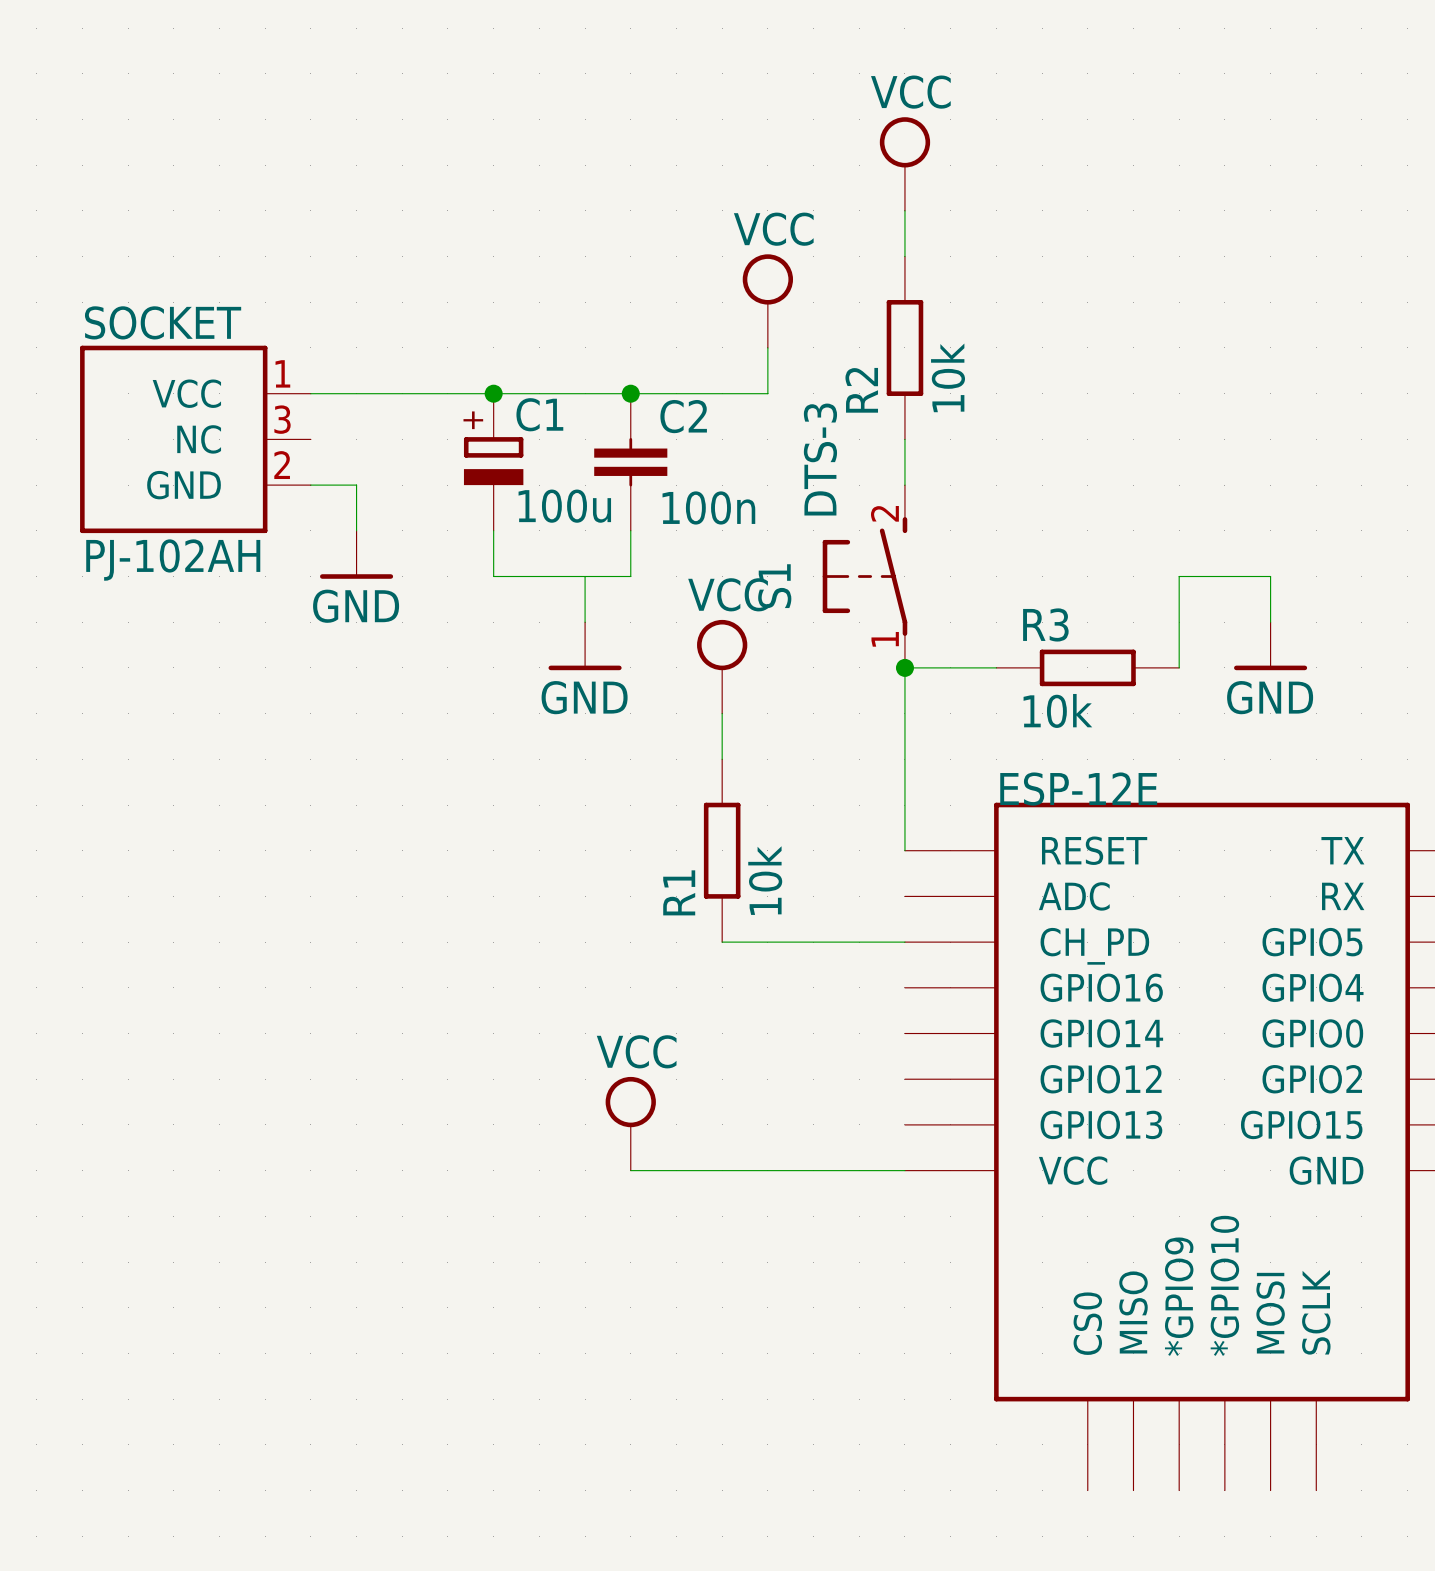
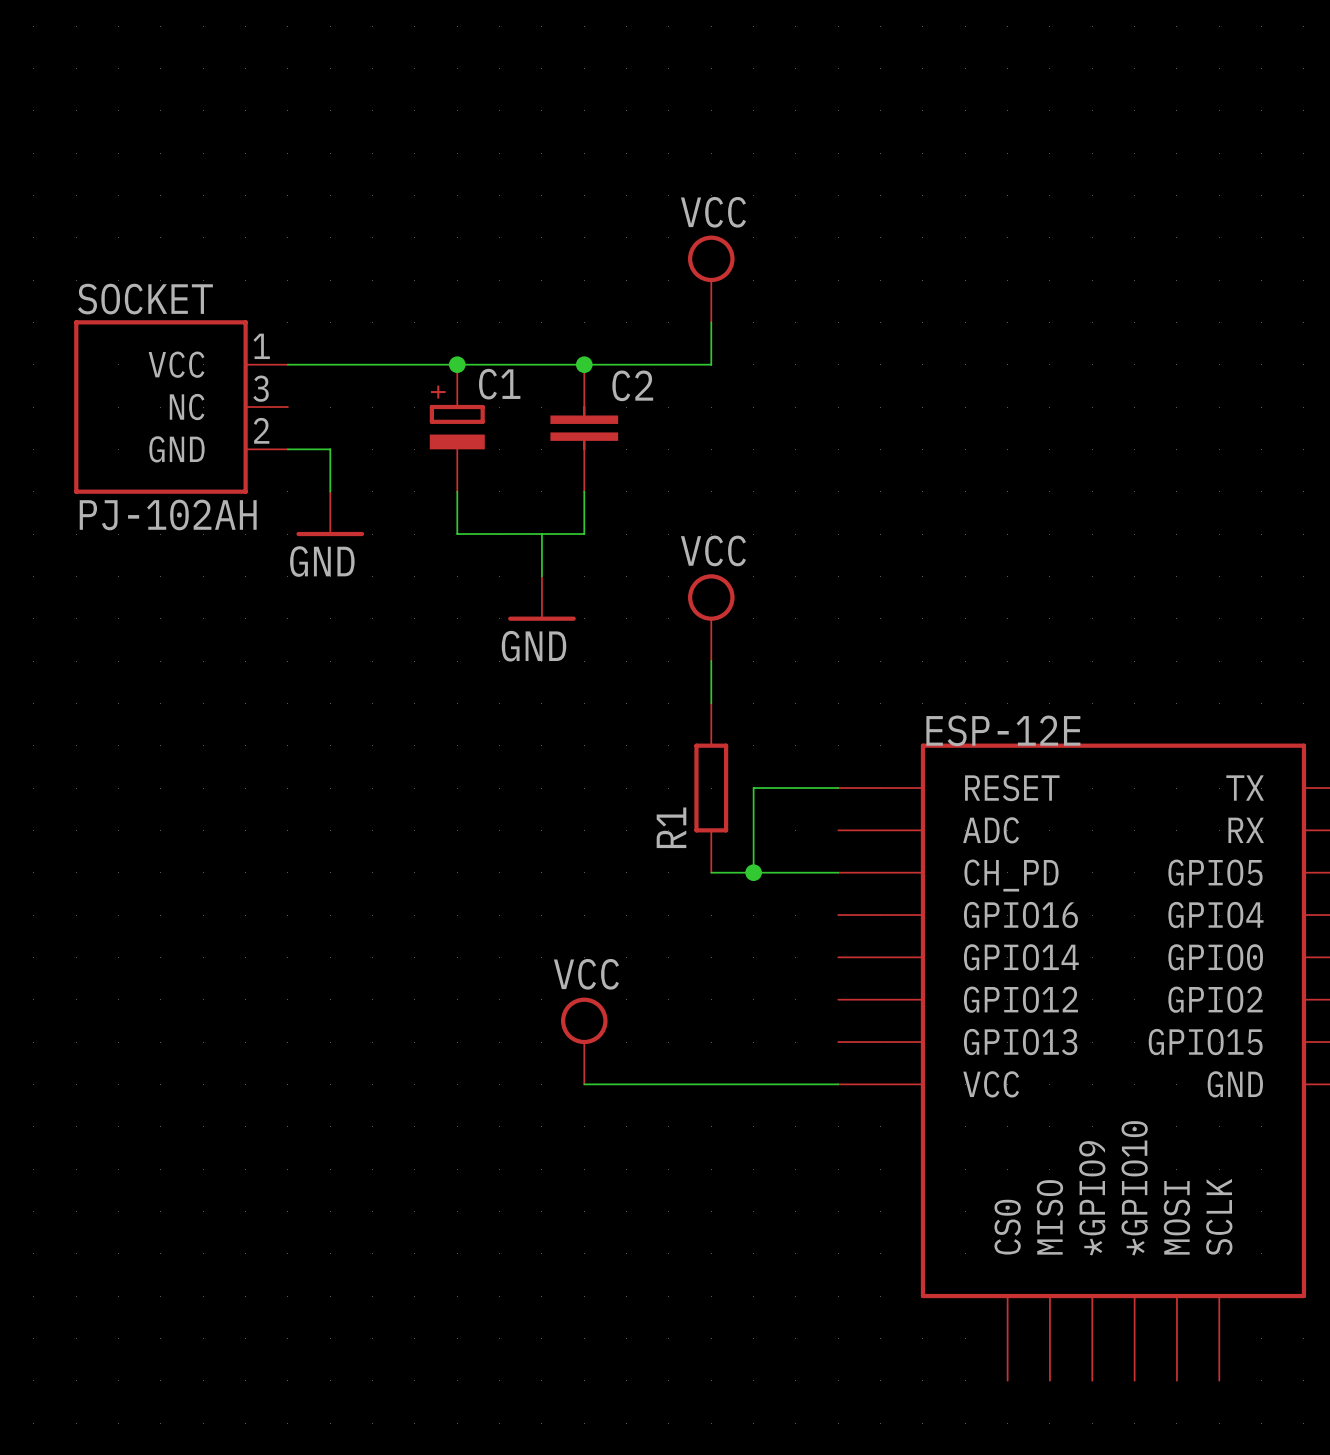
power symbol: VCC (904, 164) -> none
wire: (904, 210) (904, 256) -> none
R2: 10k (904, 347) -> none
wire: (904, 439) (904, 485) -> none
C1 value: 100u (564, 506) -> none
C2 value: 100n (708, 507) -> none
S1: DTS-3 (864, 576) -> none
wire: (1270, 622) (1270, 576) (1179, 576) (1179, 667) -> none
power symbol: GND (1270, 646) -> none
power symbol position: VCC (722, 666) -> VCC (711, 617)
junction: (904, 667) -> none
wire: (996, 667) (904, 667) (904, 850) -> (753, 872) (753, 788) (838, 788)
R3: 10k (1087, 667) -> none
wire: (722, 713) (722, 759) -> (711, 661) (711, 703)
R1 position: (722, 850) -> (711, 788)
R1 value: 10k (765, 880) -> none
wire: (722, 942) (767, 942) -> none
junction: none -> (753, 872)

